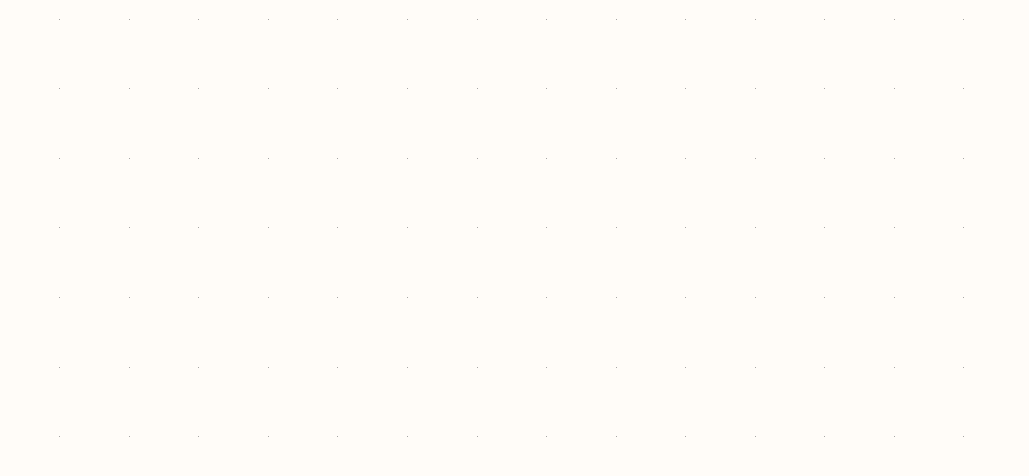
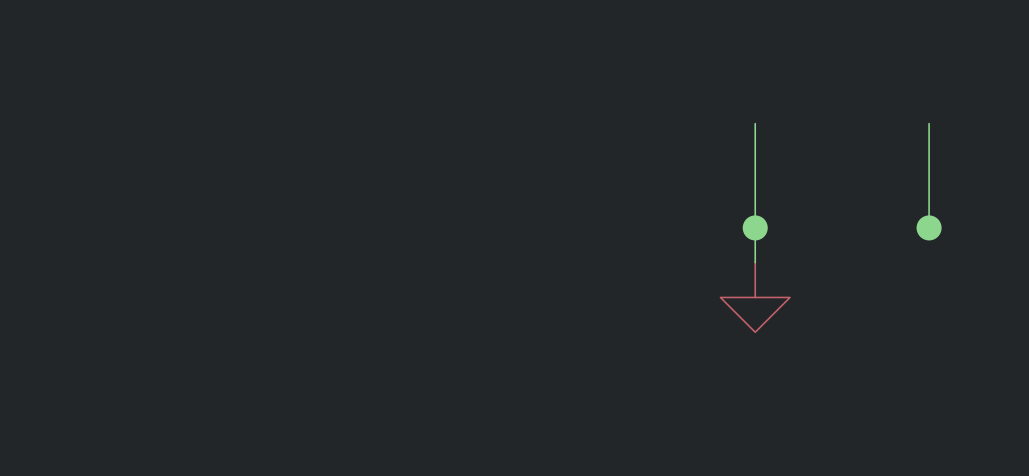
wire: none -> (755, 123) (755, 262)
wire: none -> (929, 123) (929, 227)
junction: none -> (755, 227)
junction: none -> (929, 227)
power symbol: none -> (755, 297)

